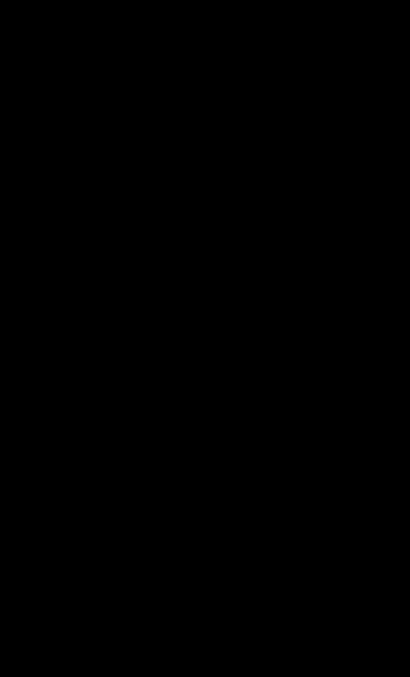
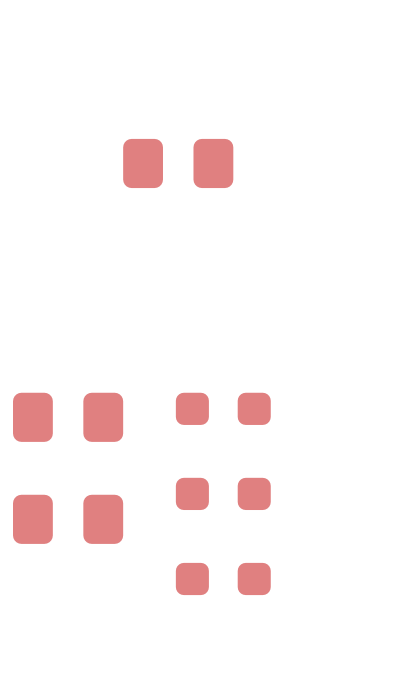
part: none -> (178, 163)
part: none -> (223, 408)
part: none -> (68, 417)
part: none -> (223, 493)
part: none -> (68, 519)
part: none -> (223, 578)

